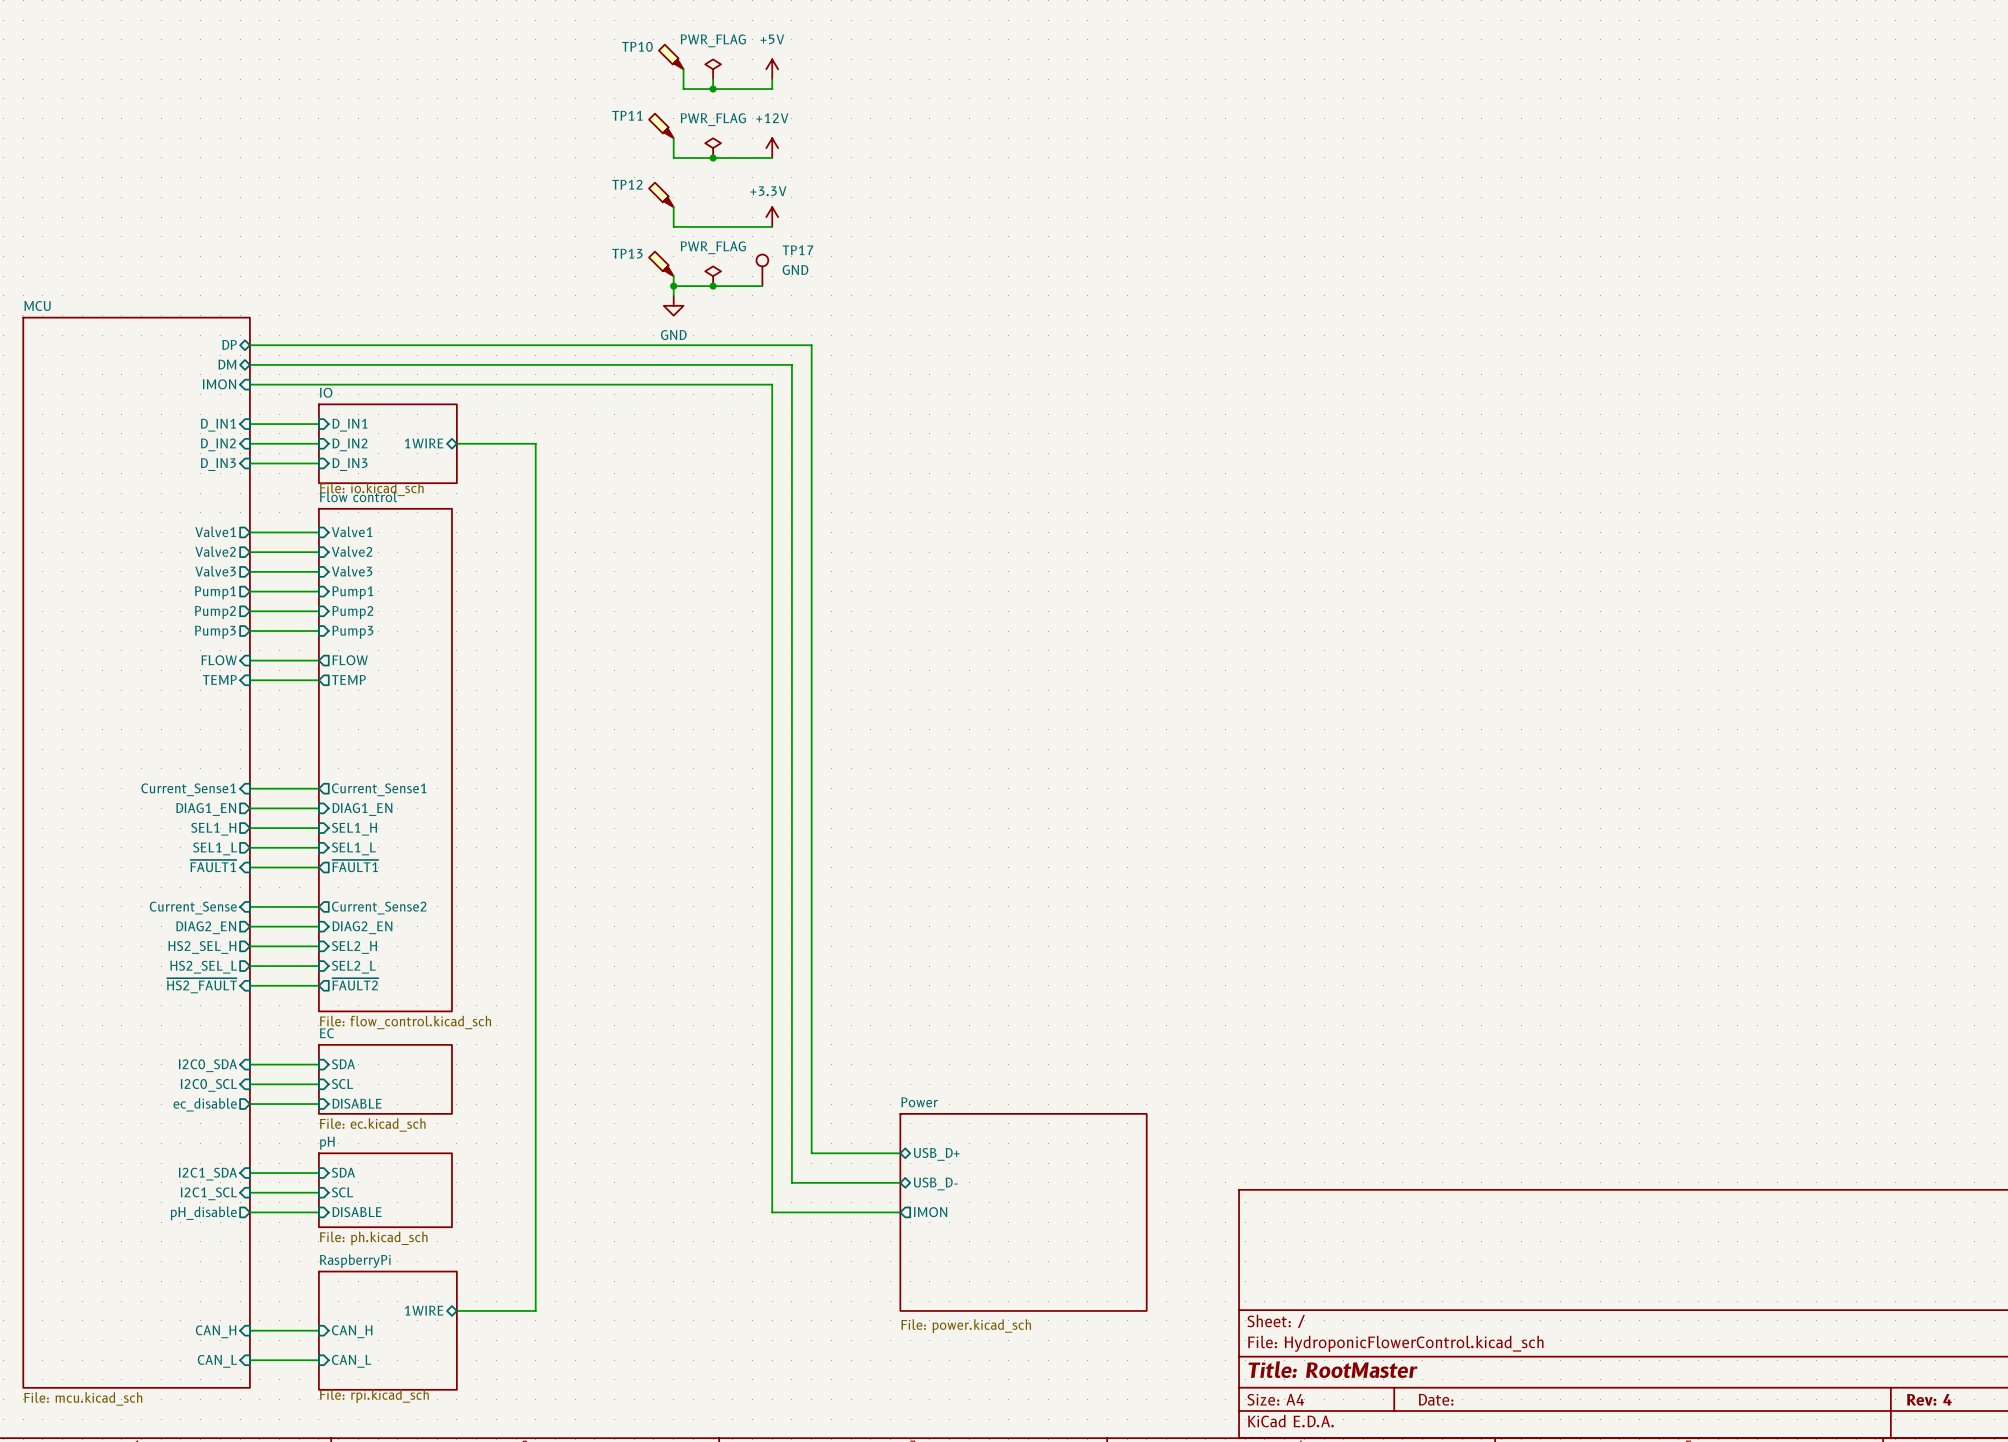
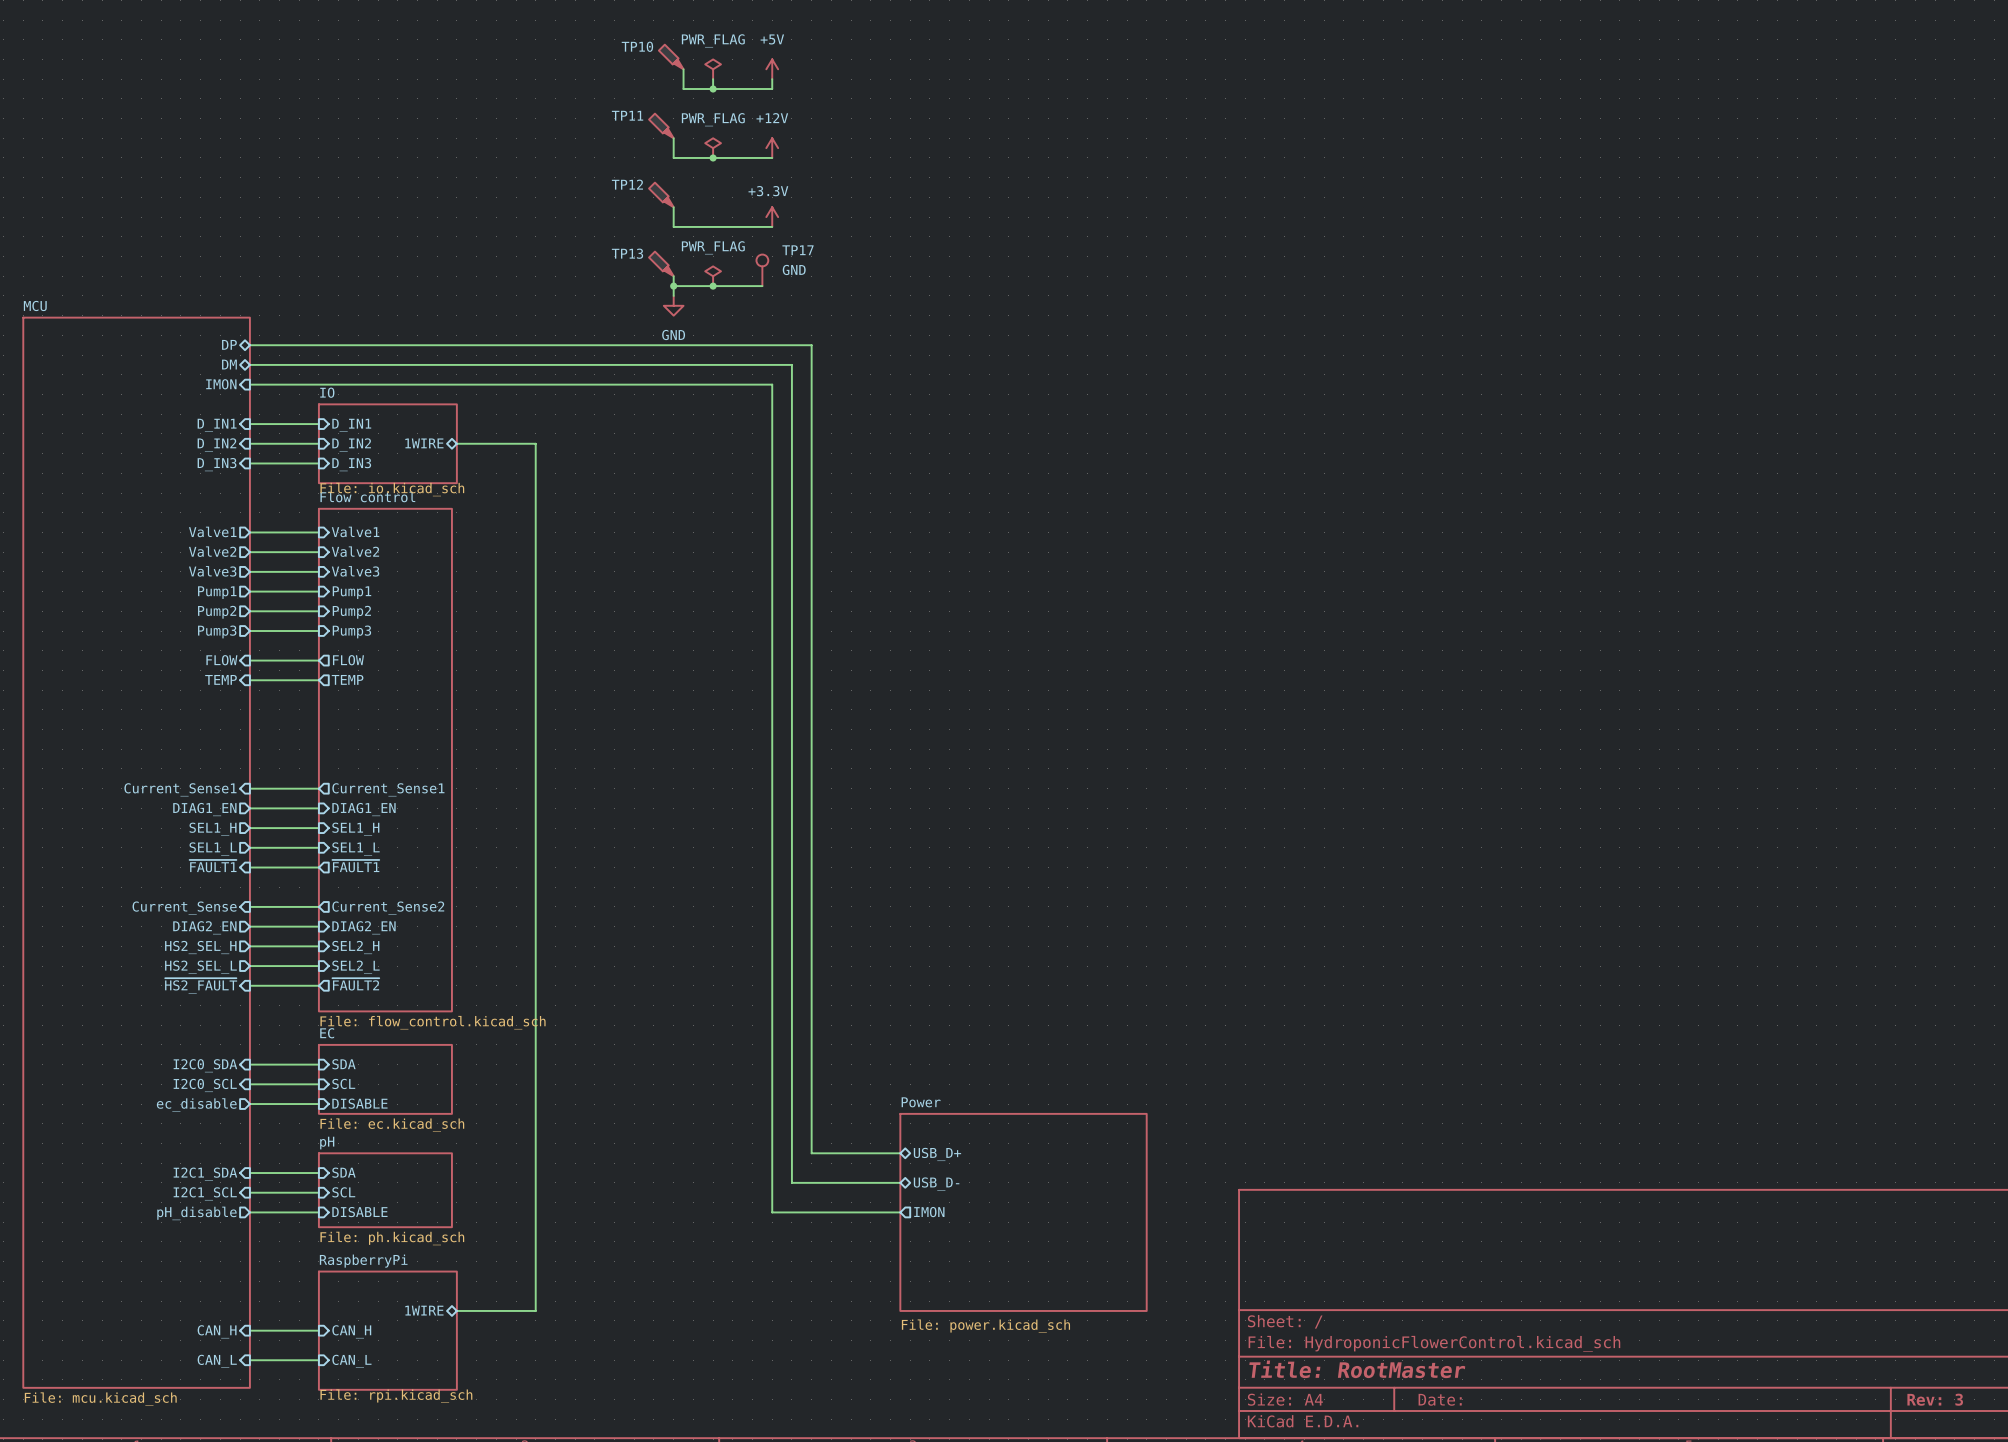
title block: Rev: 4 (1929, 1399) -> Rev: 3 (1935, 1399)

